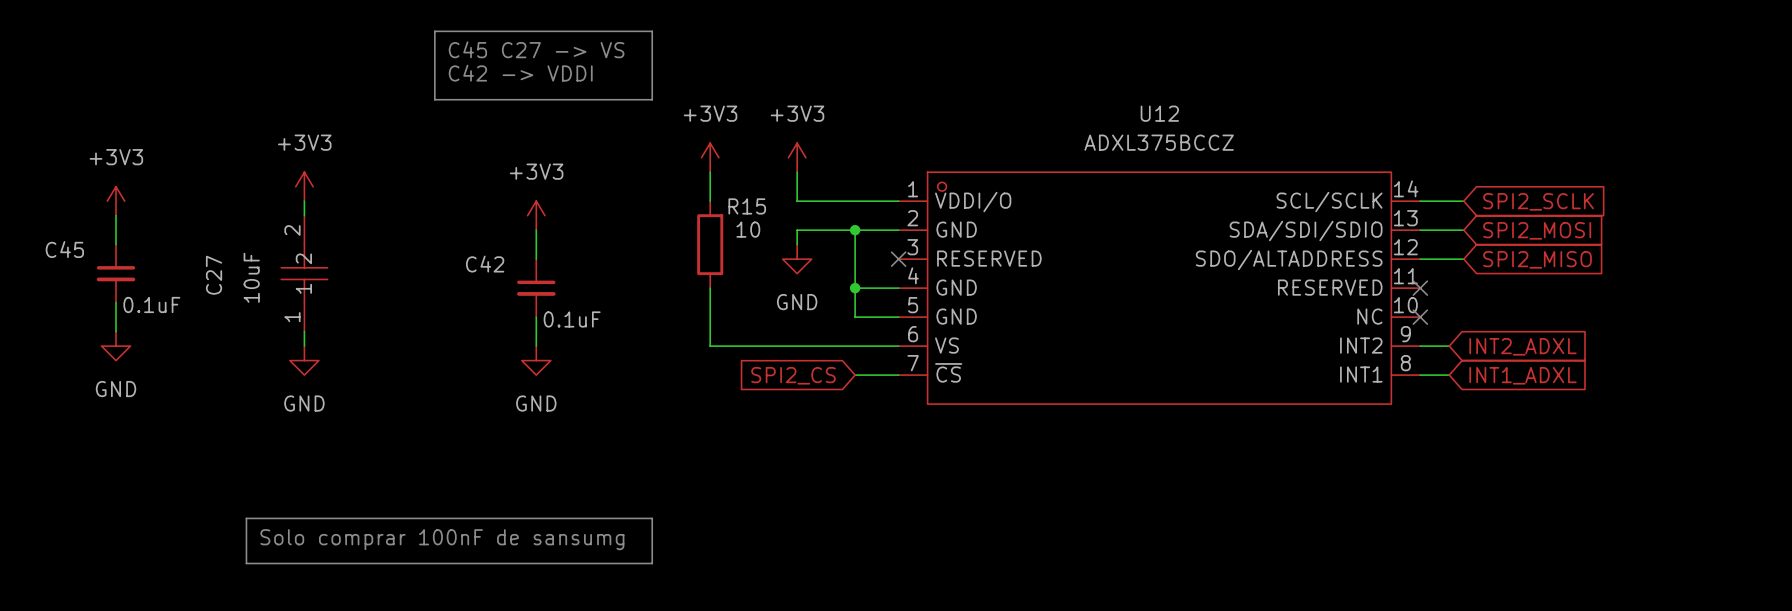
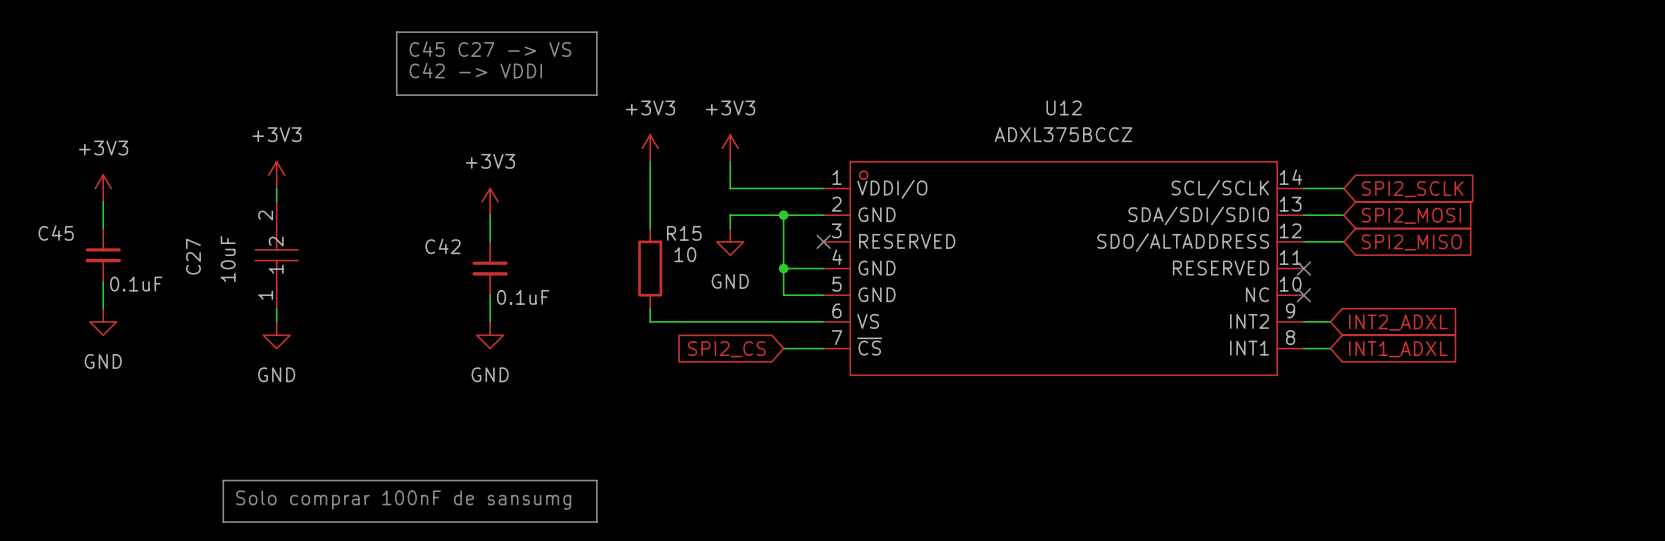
R15 position: (710, 244) -> (650, 268)
wire: (710, 288) (710, 331) -> (650, 188) (650, 228)

